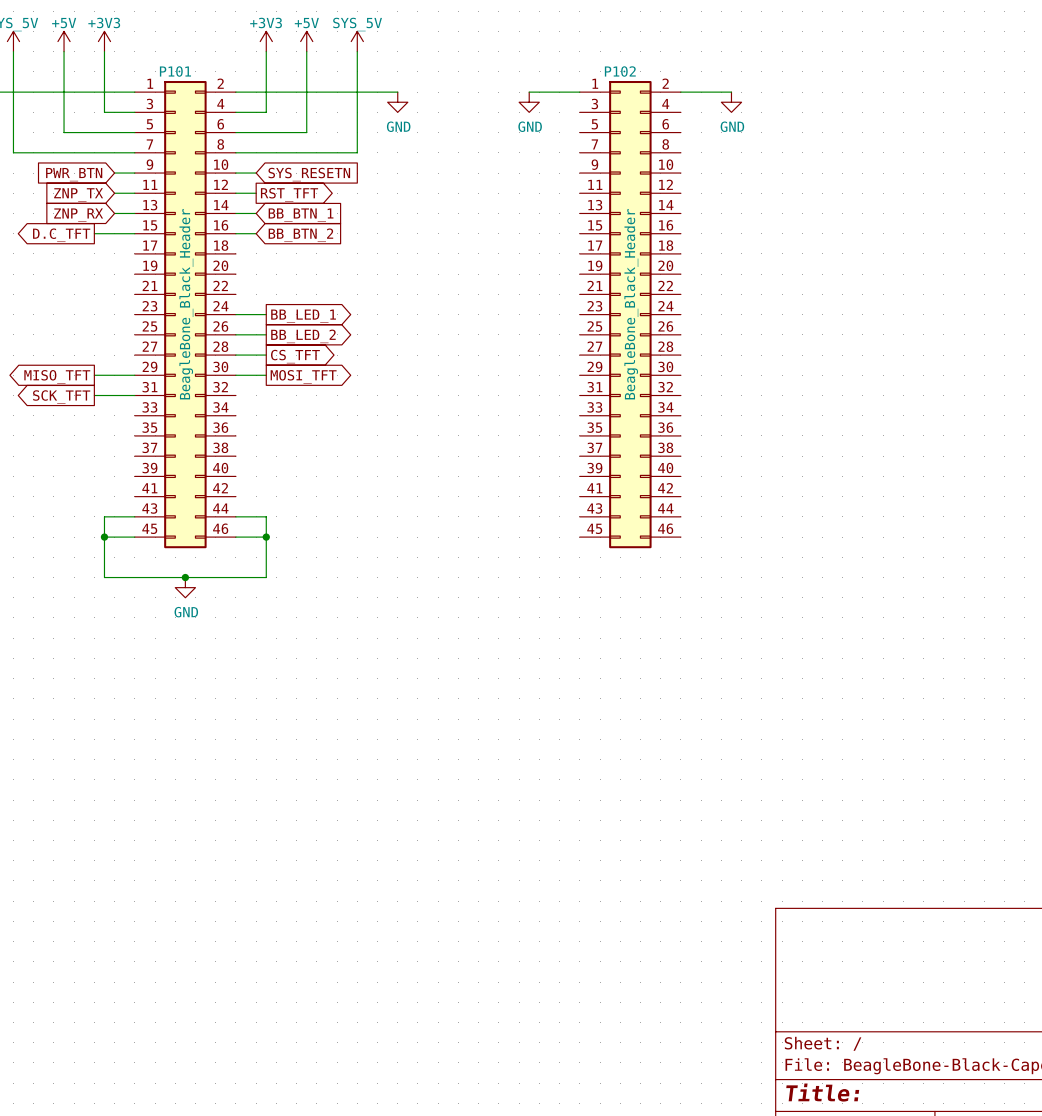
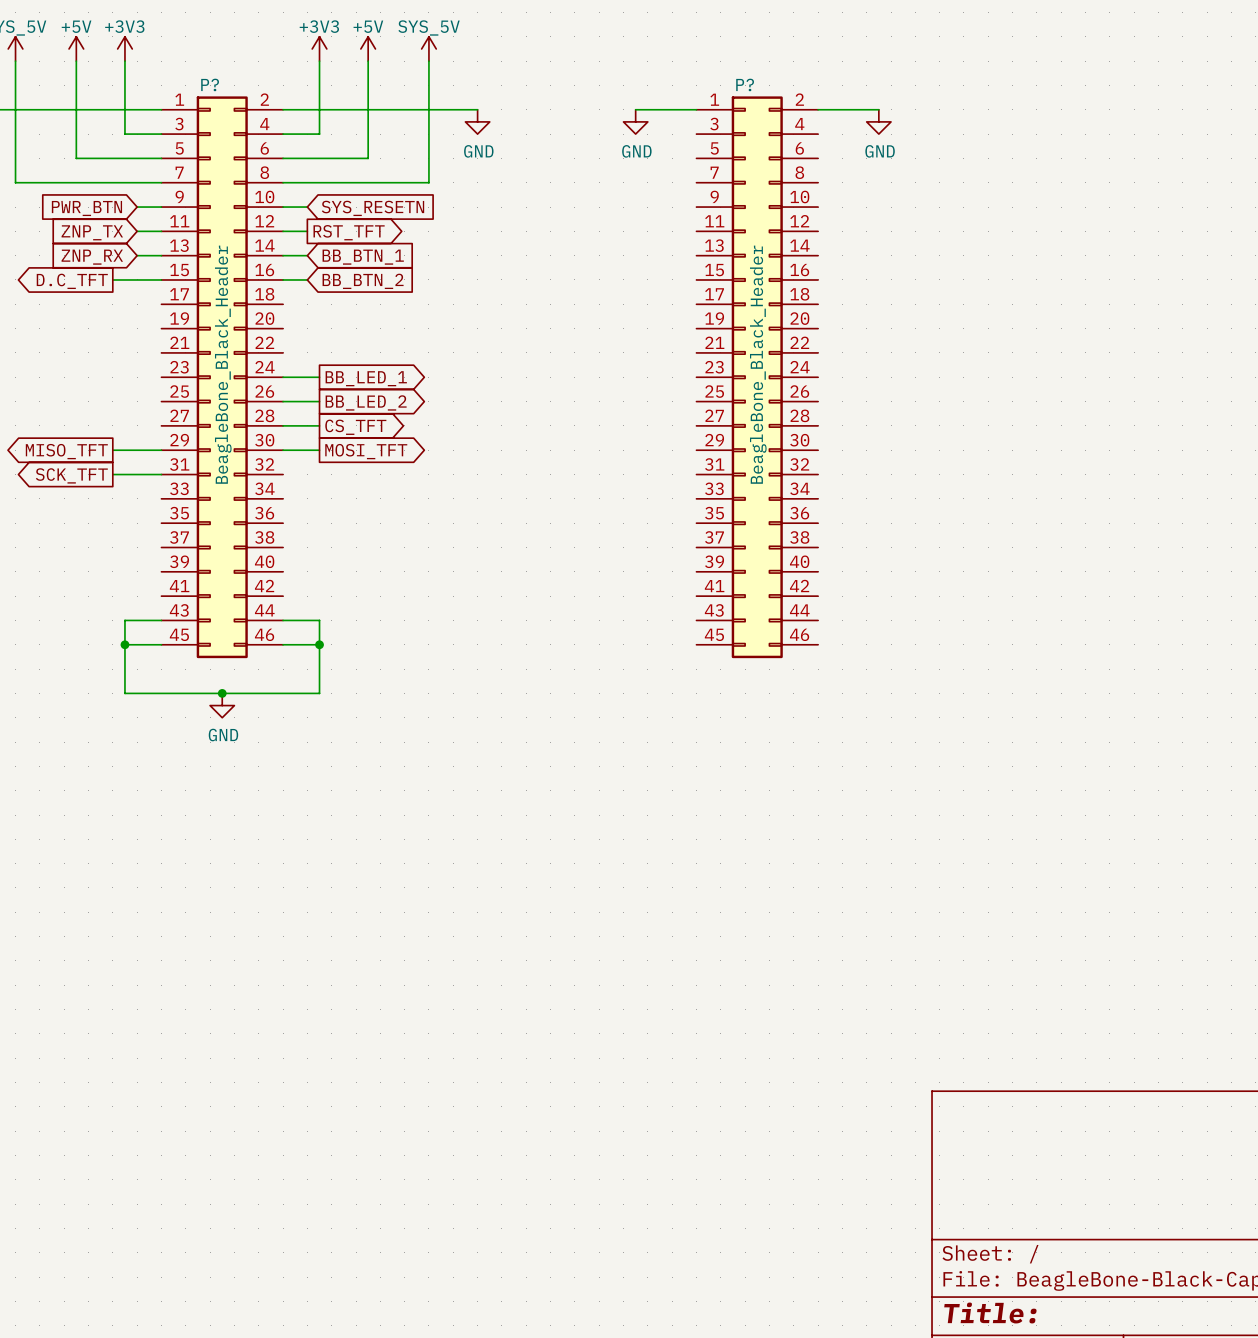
P101 name: P101 (175, 71) -> P? (210, 84)
P102 name: P102 (620, 71) -> P? (745, 84)

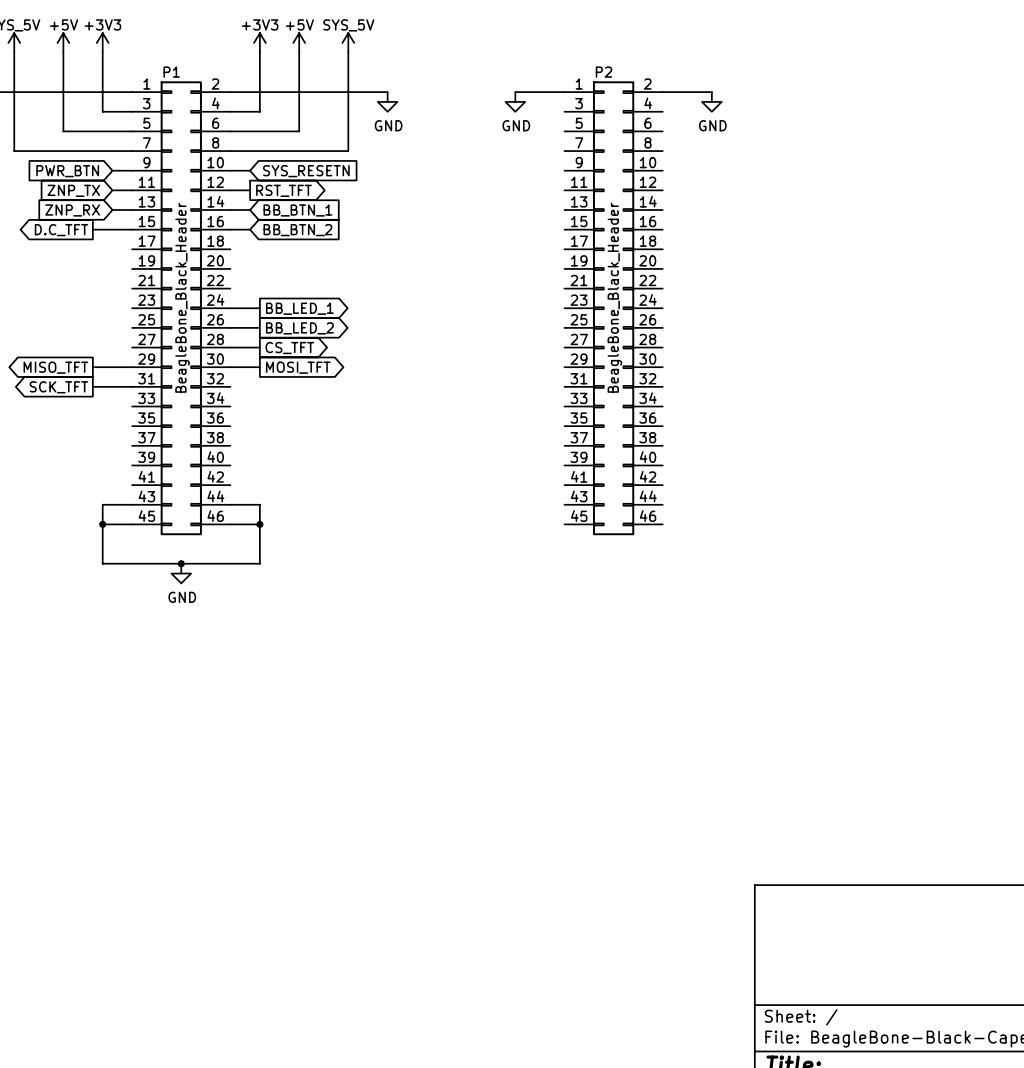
P? name: P? (210, 84) -> P1 (171, 72)
P? name: P? (745, 84) -> P2 (604, 72)

